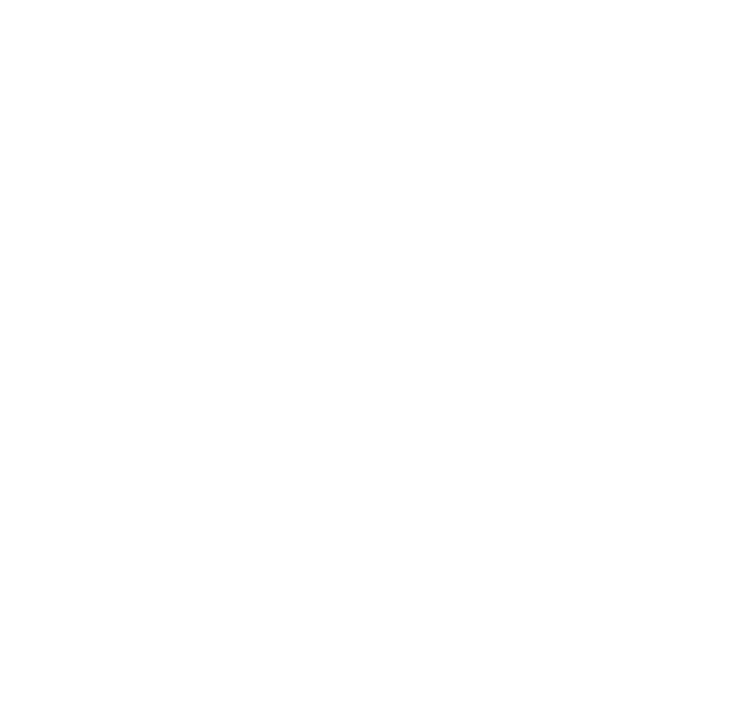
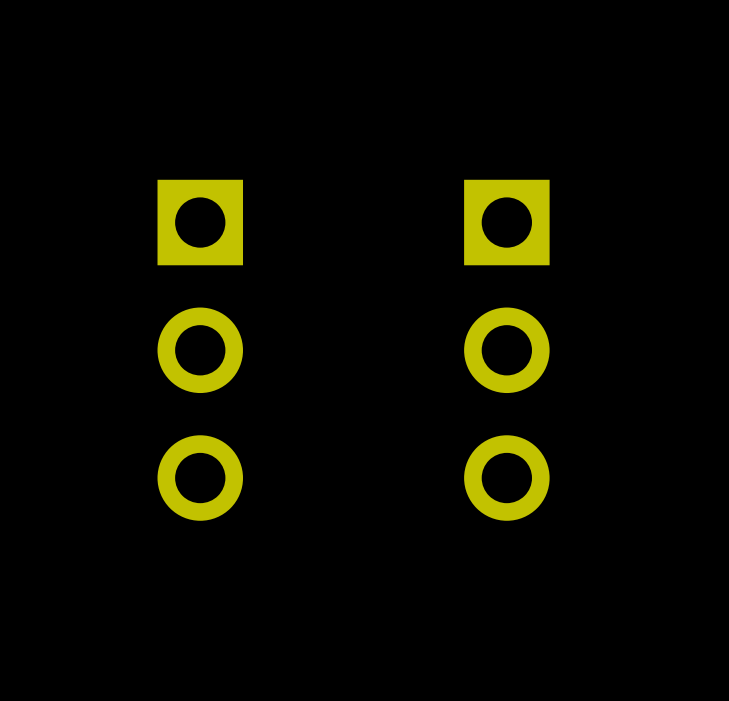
part: none -> (200, 350)
part: none -> (506, 350)

